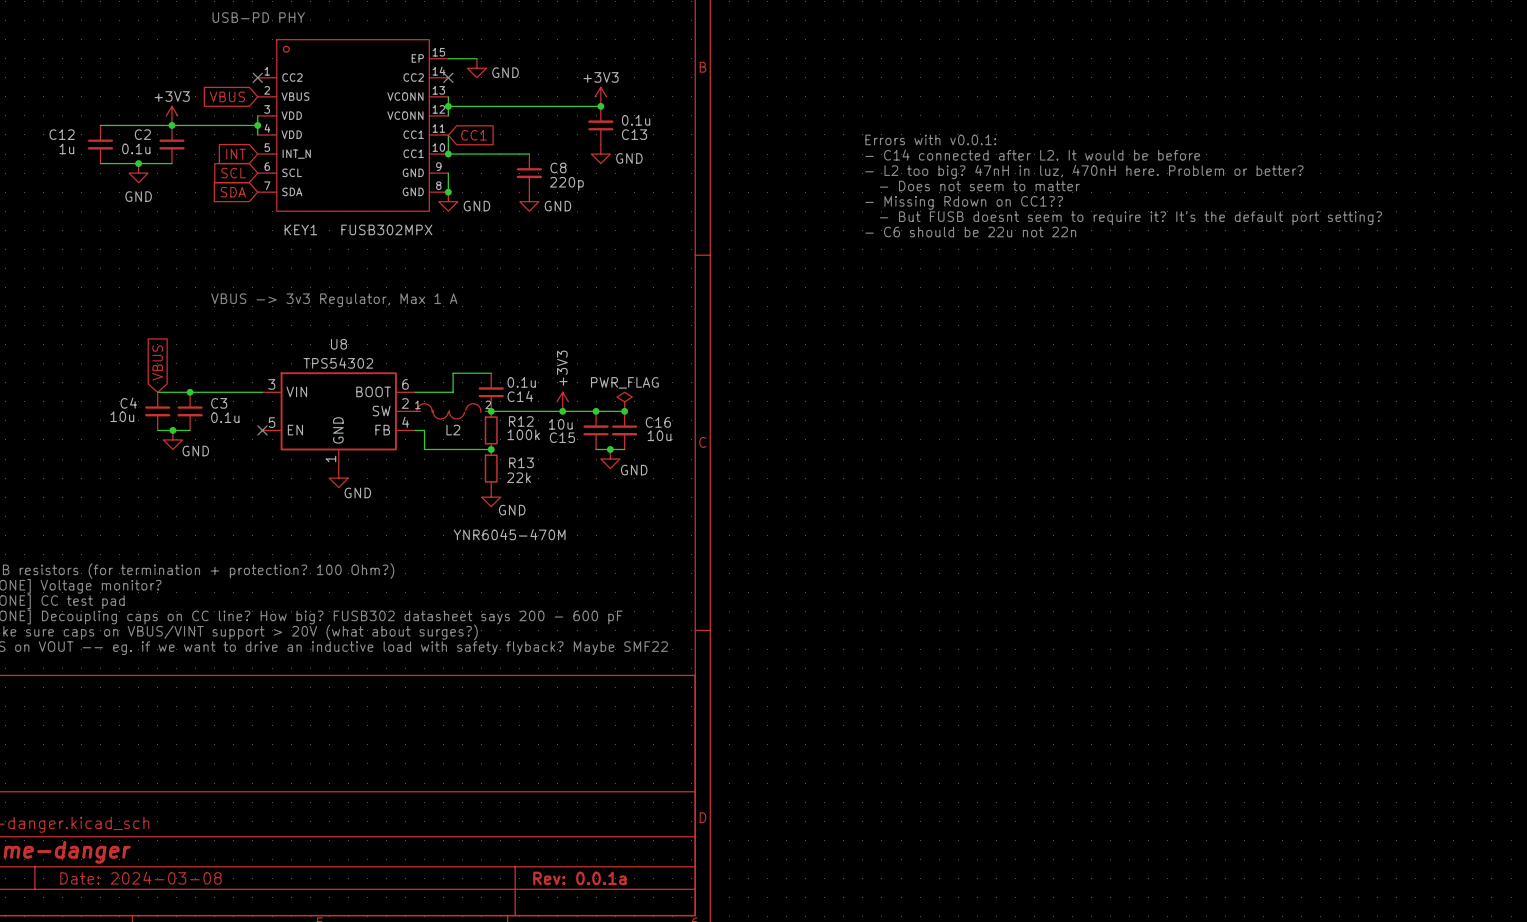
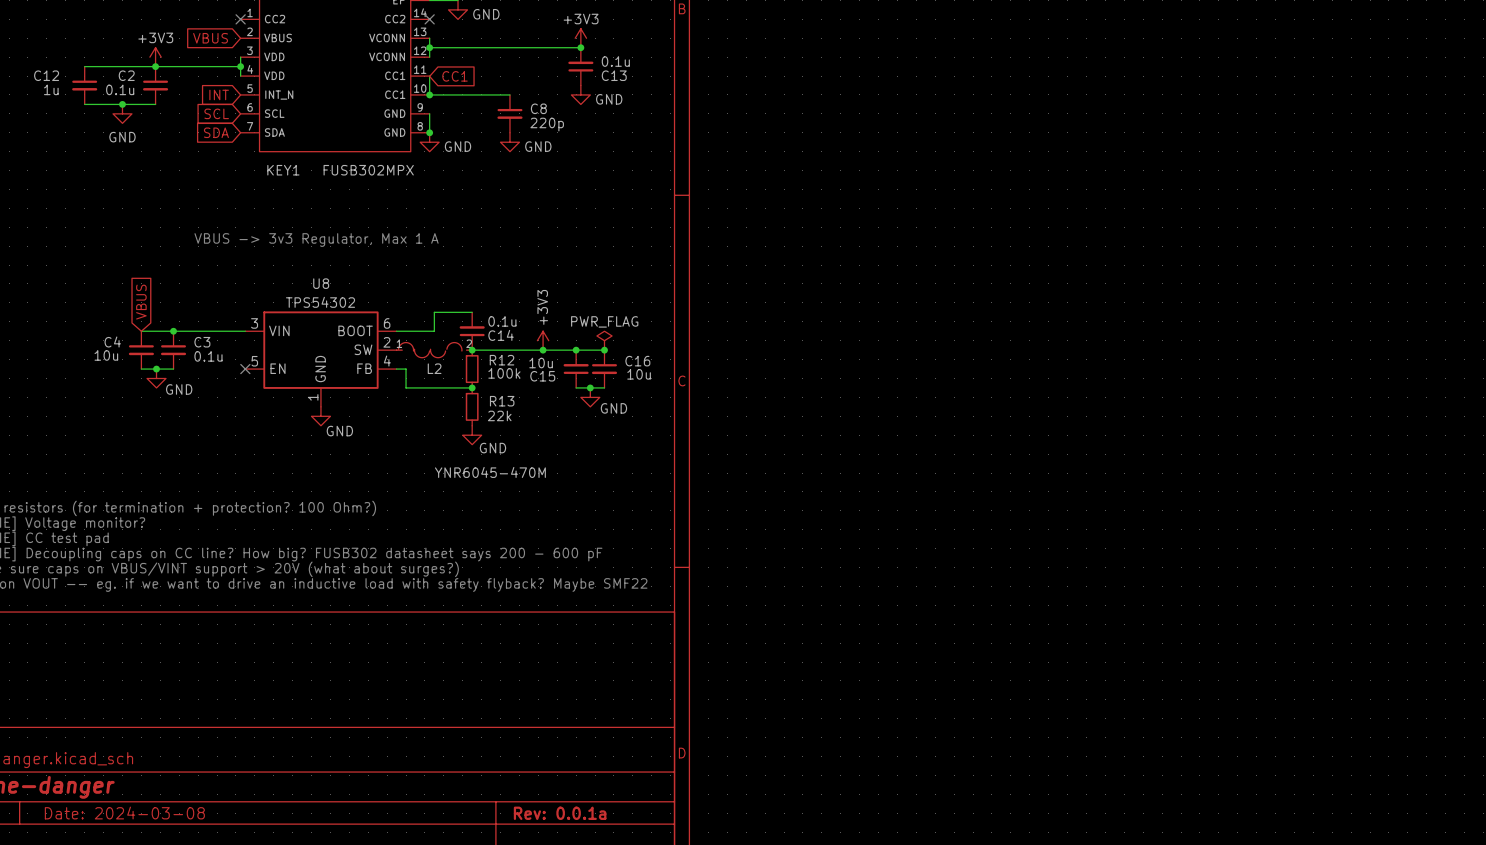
text: Errors with v0.0.1: (930, 139) -> none
text: - C14 connected after L2. It would be before (1032, 155) -> none
text: - L2 too big? 47nH in luz, 470nH here. Problem or better? (1084, 171) -> none
text: - Does not seem to matter (979, 185) -> none
text: - Missing Rdown on CC1?? (964, 202) -> none
text: - But FUSB doesnt seem to require it? It's the default port setting? (1130, 218) -> none
text: - C6 should be 22u not 22n (970, 232) -> none

